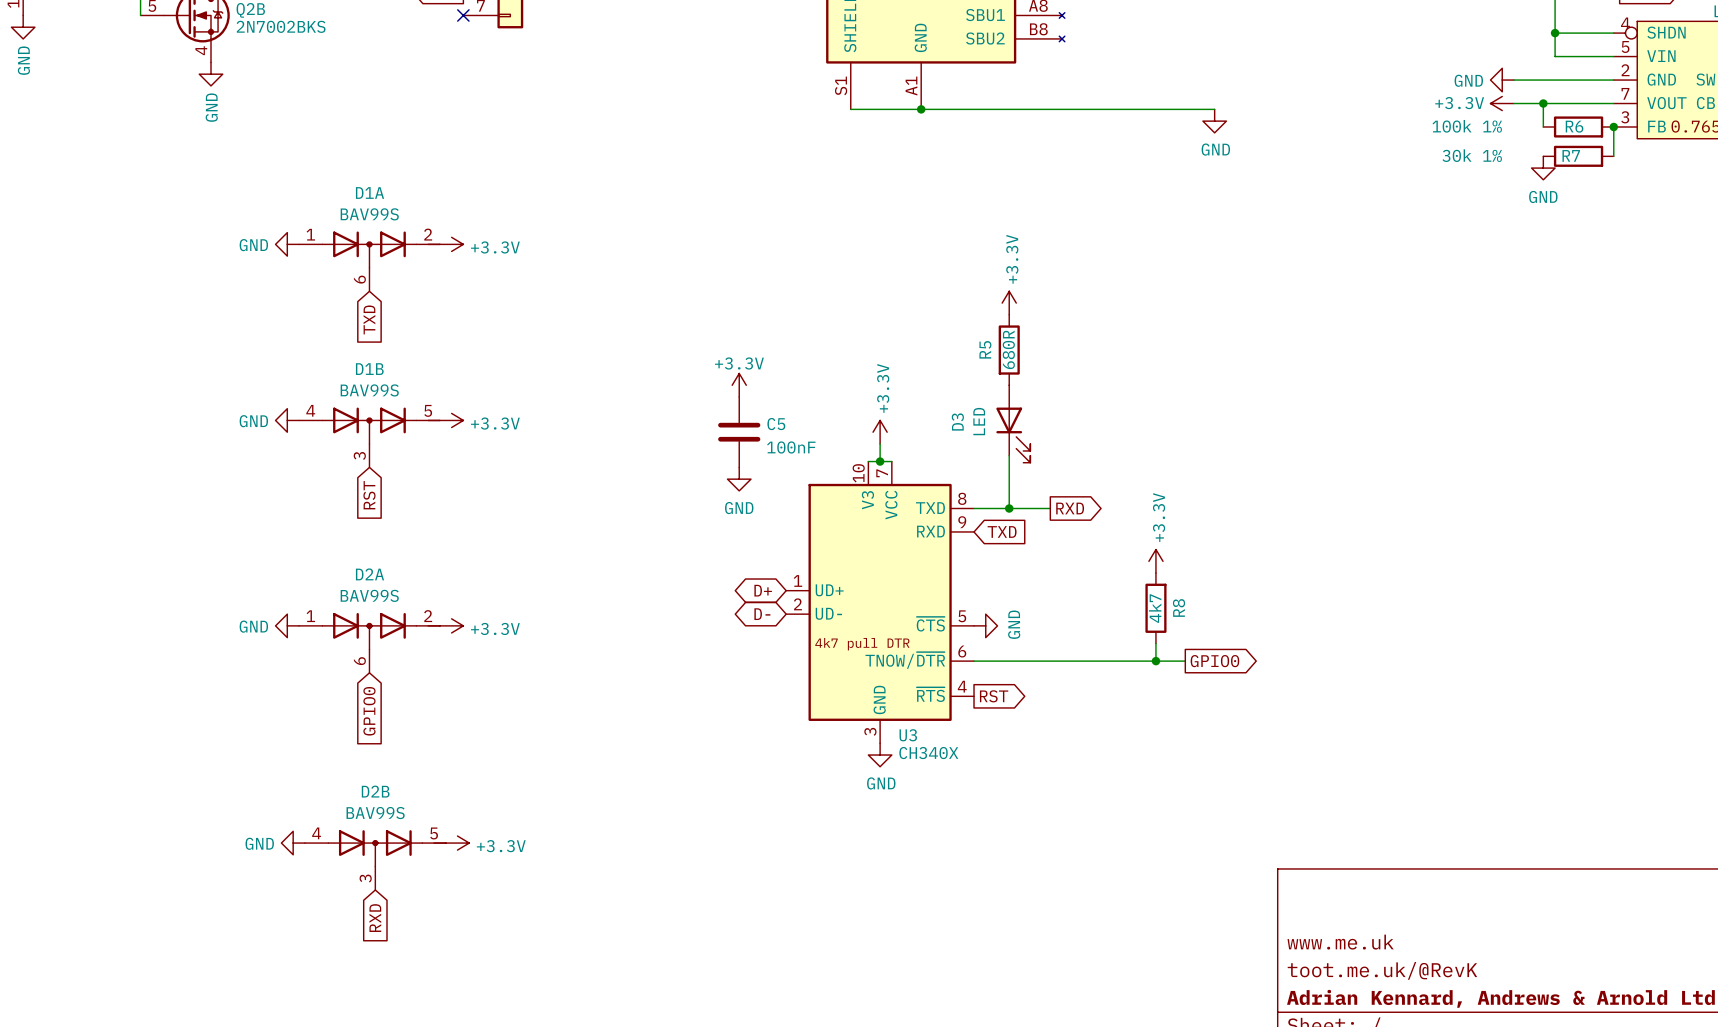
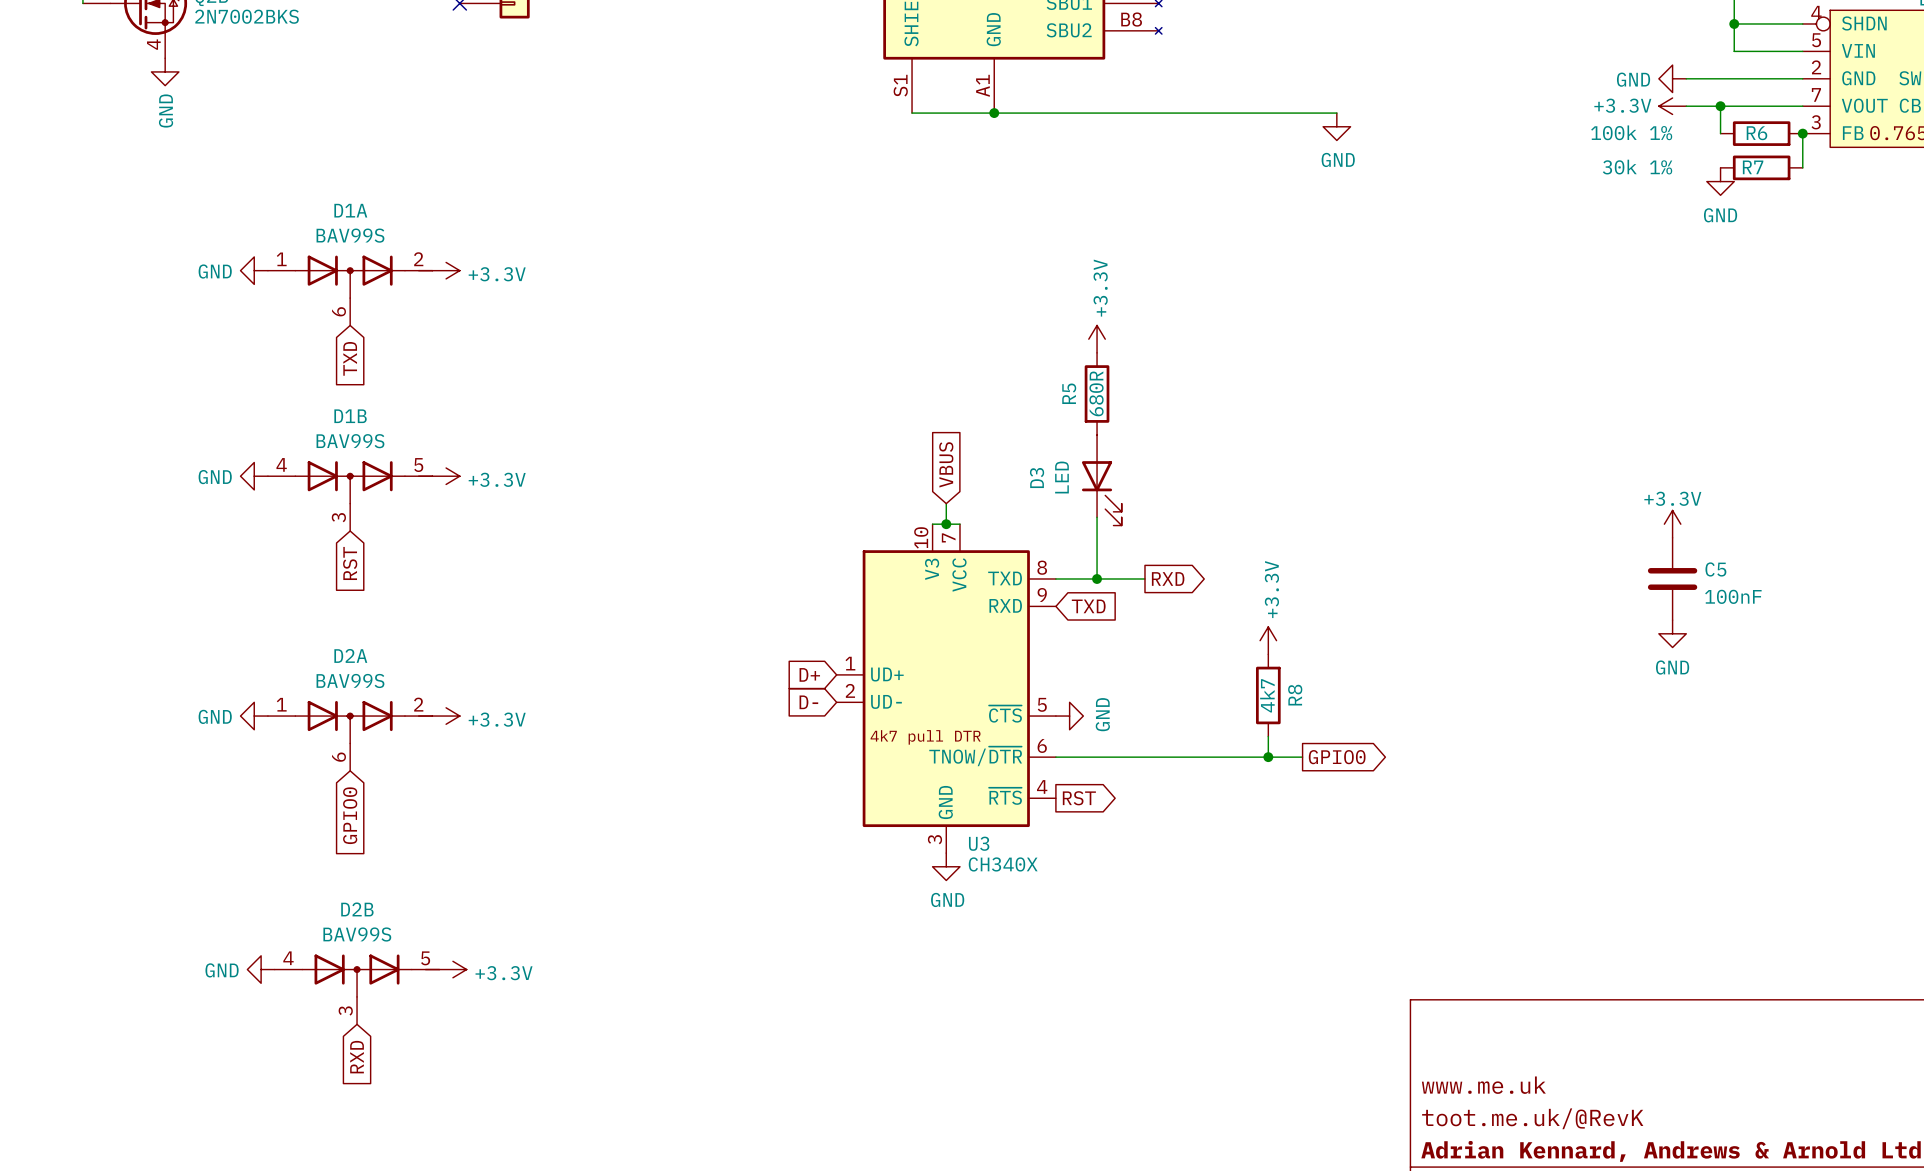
power symbol: +3.3V (739, 385) -> none
global label: none -> VBUS (946, 464)
C5 position: (739, 432) -> (1672, 578)
power symbol: +3.3V (880, 432) -> none
power symbol: none -> +3.3V (1672, 524)
power symbol: GND (739, 479) -> none
power symbol: none -> GND (1672, 633)
global label shape: bidirectional (763, 590) -> input (809, 674)
global label shape: bidirectional (762, 614) -> input (808, 702)

